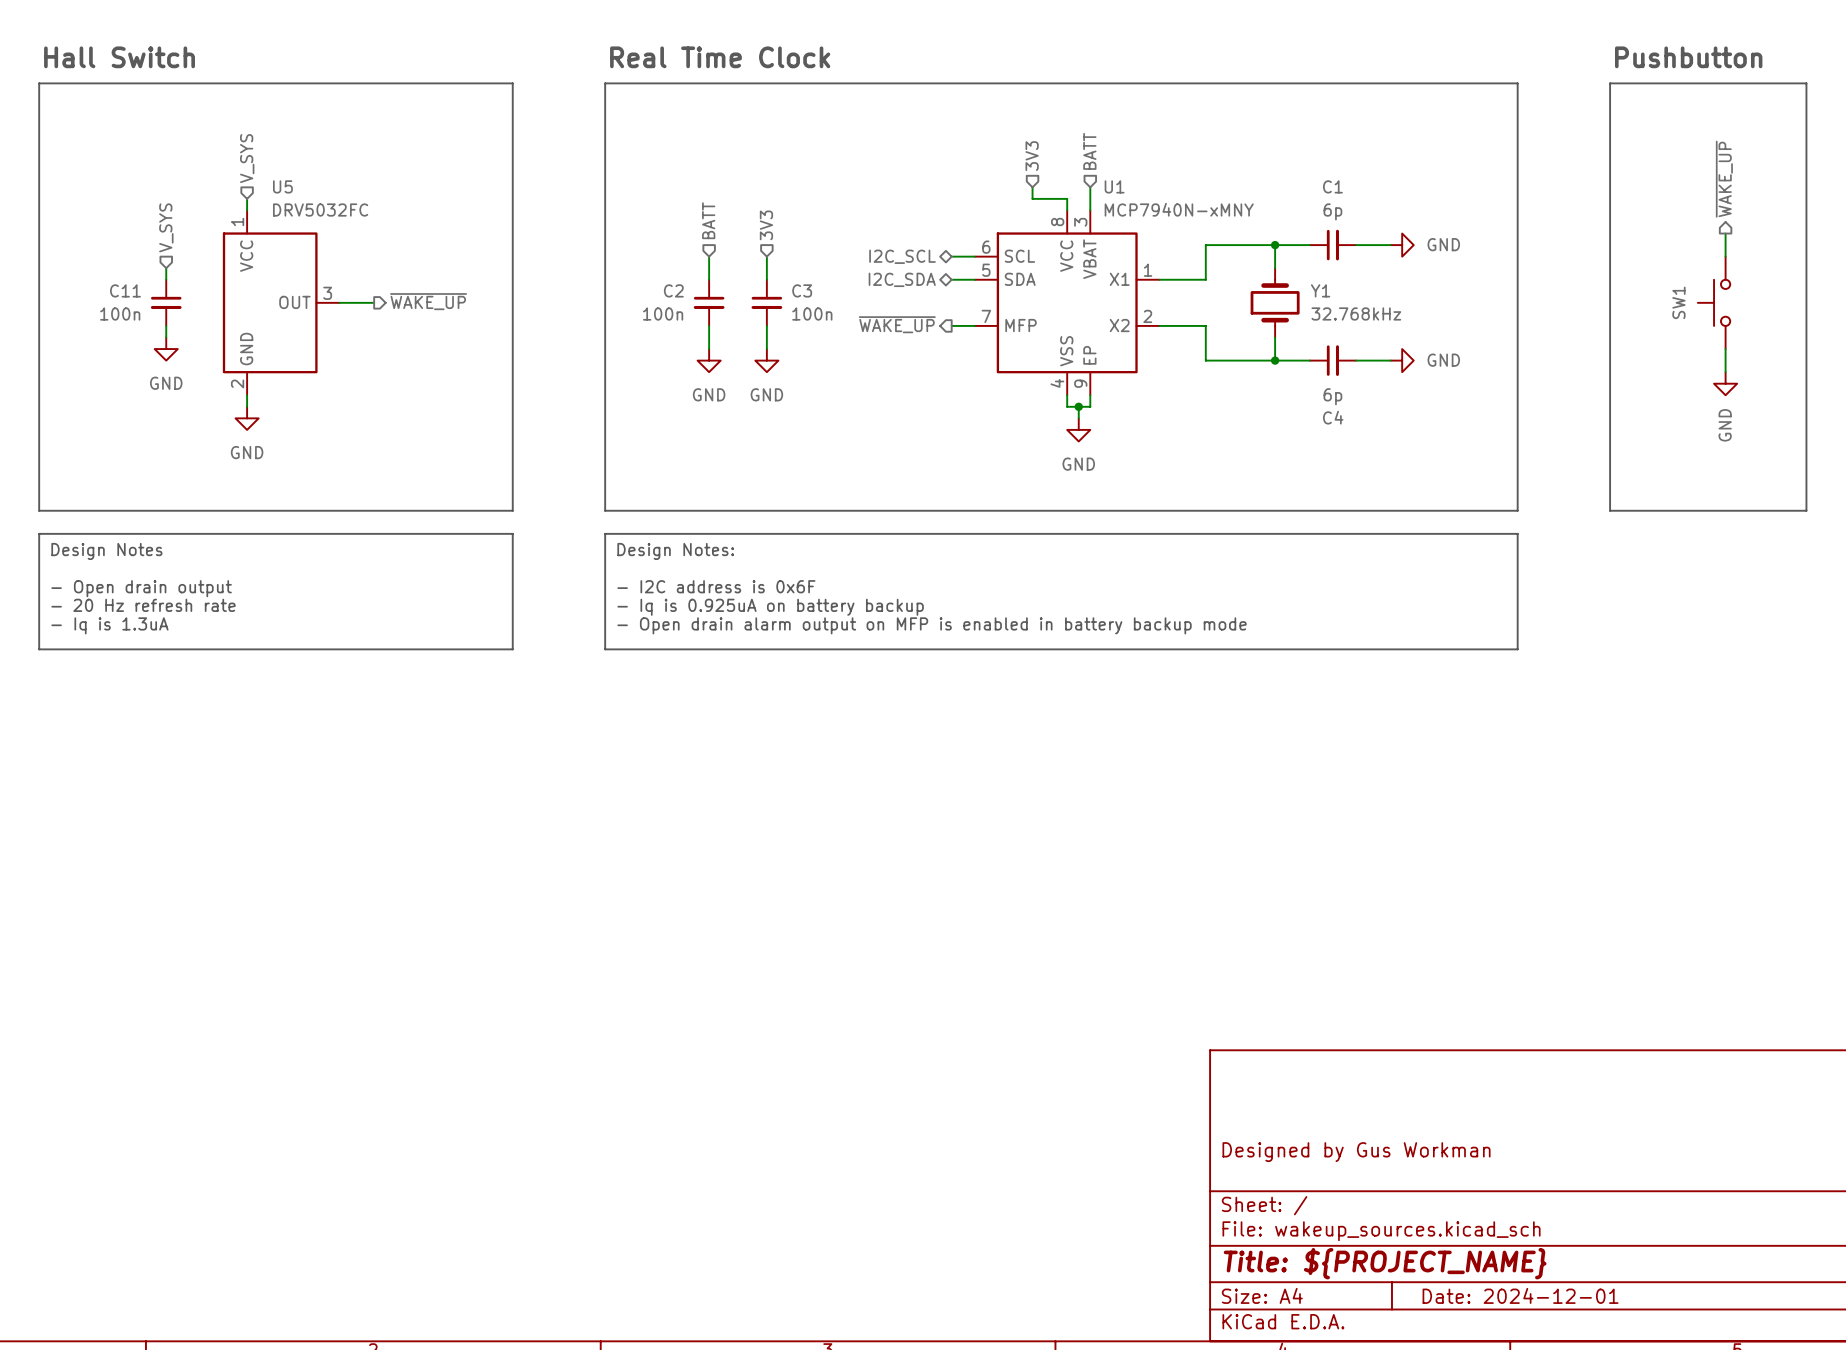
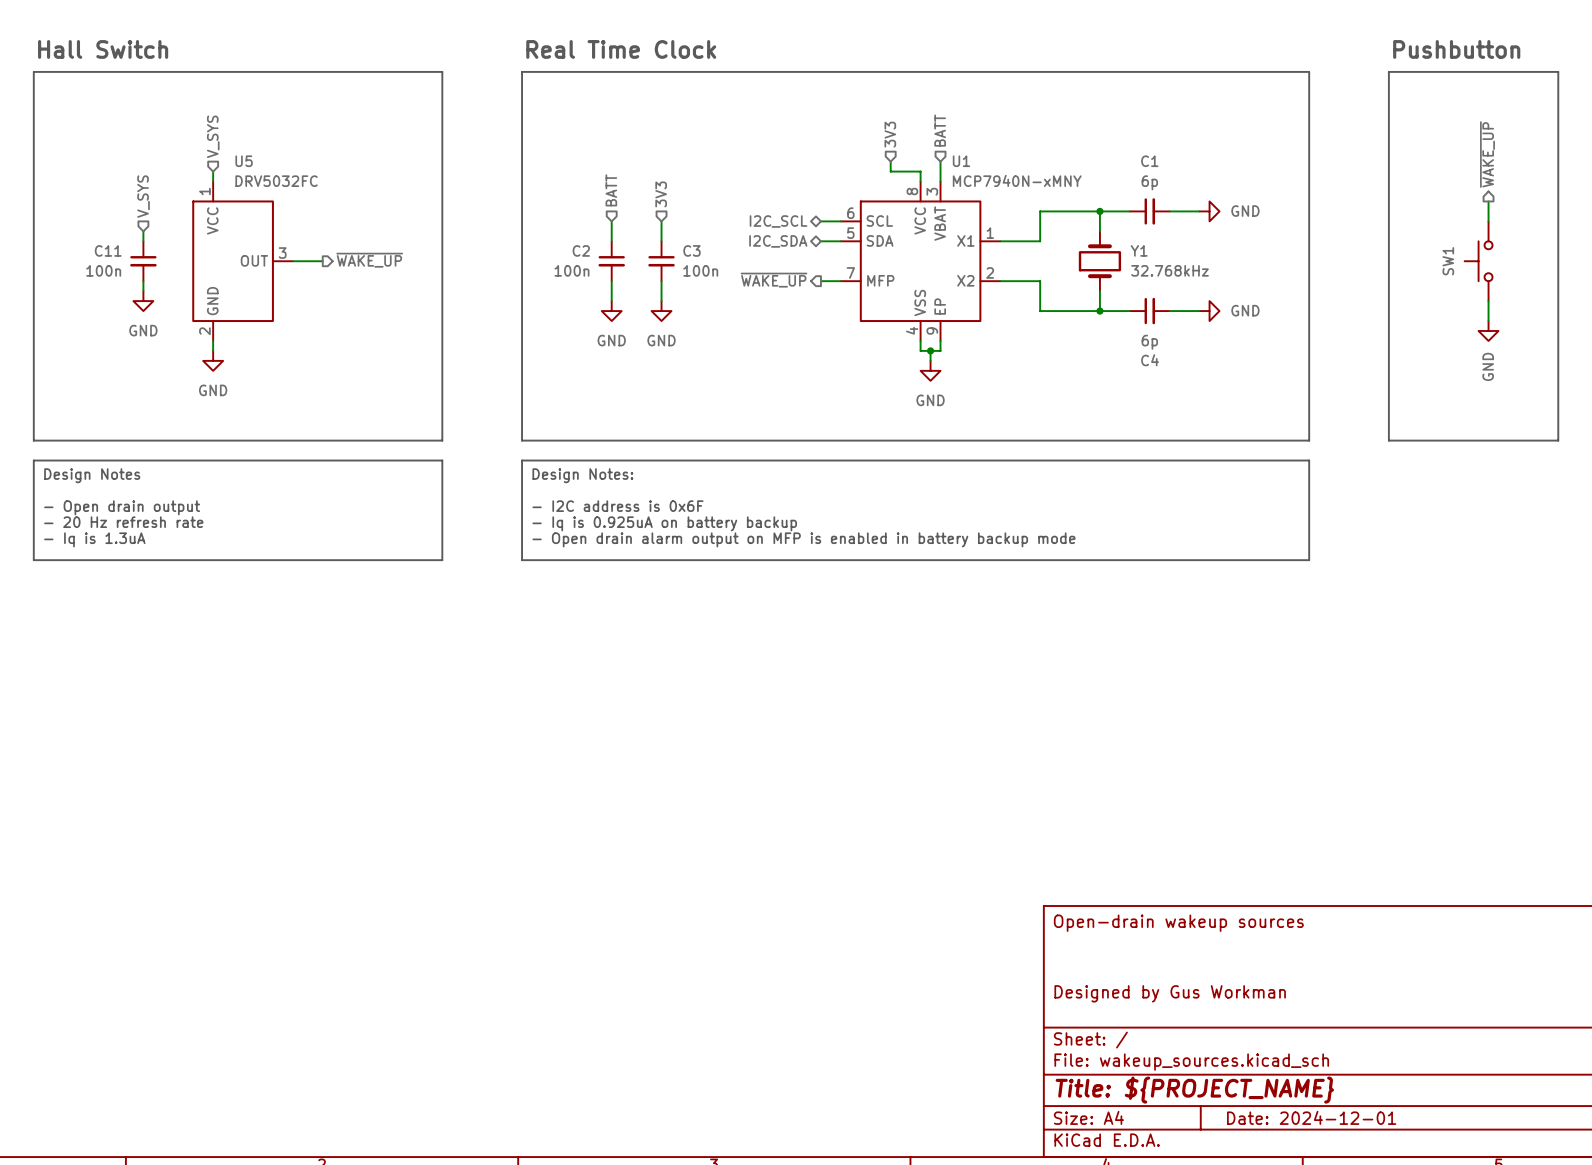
title block: none -> Open-drain wakeup sources (1178, 923)

